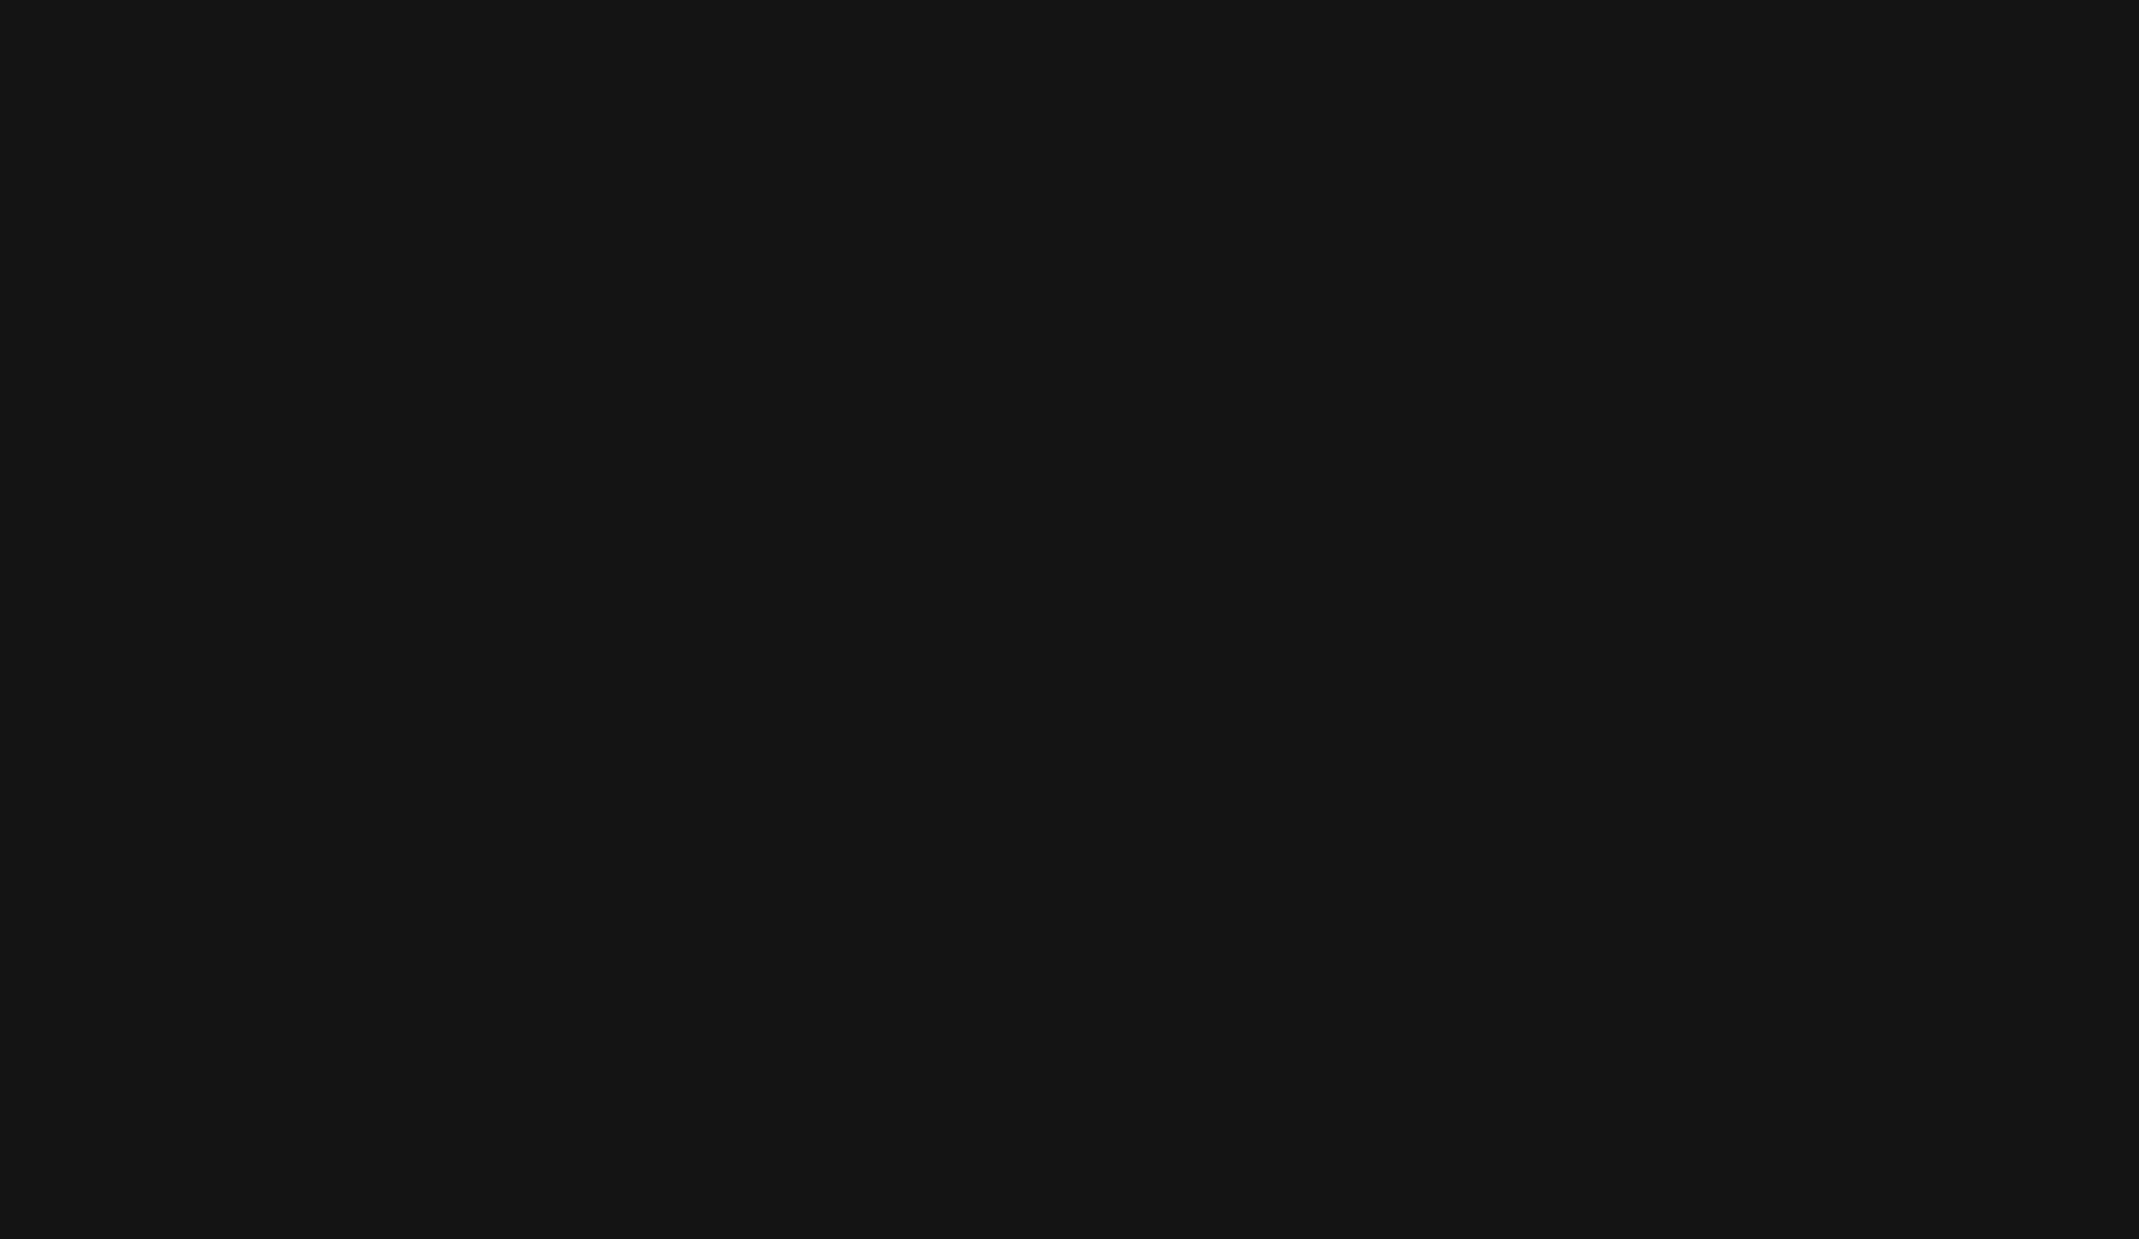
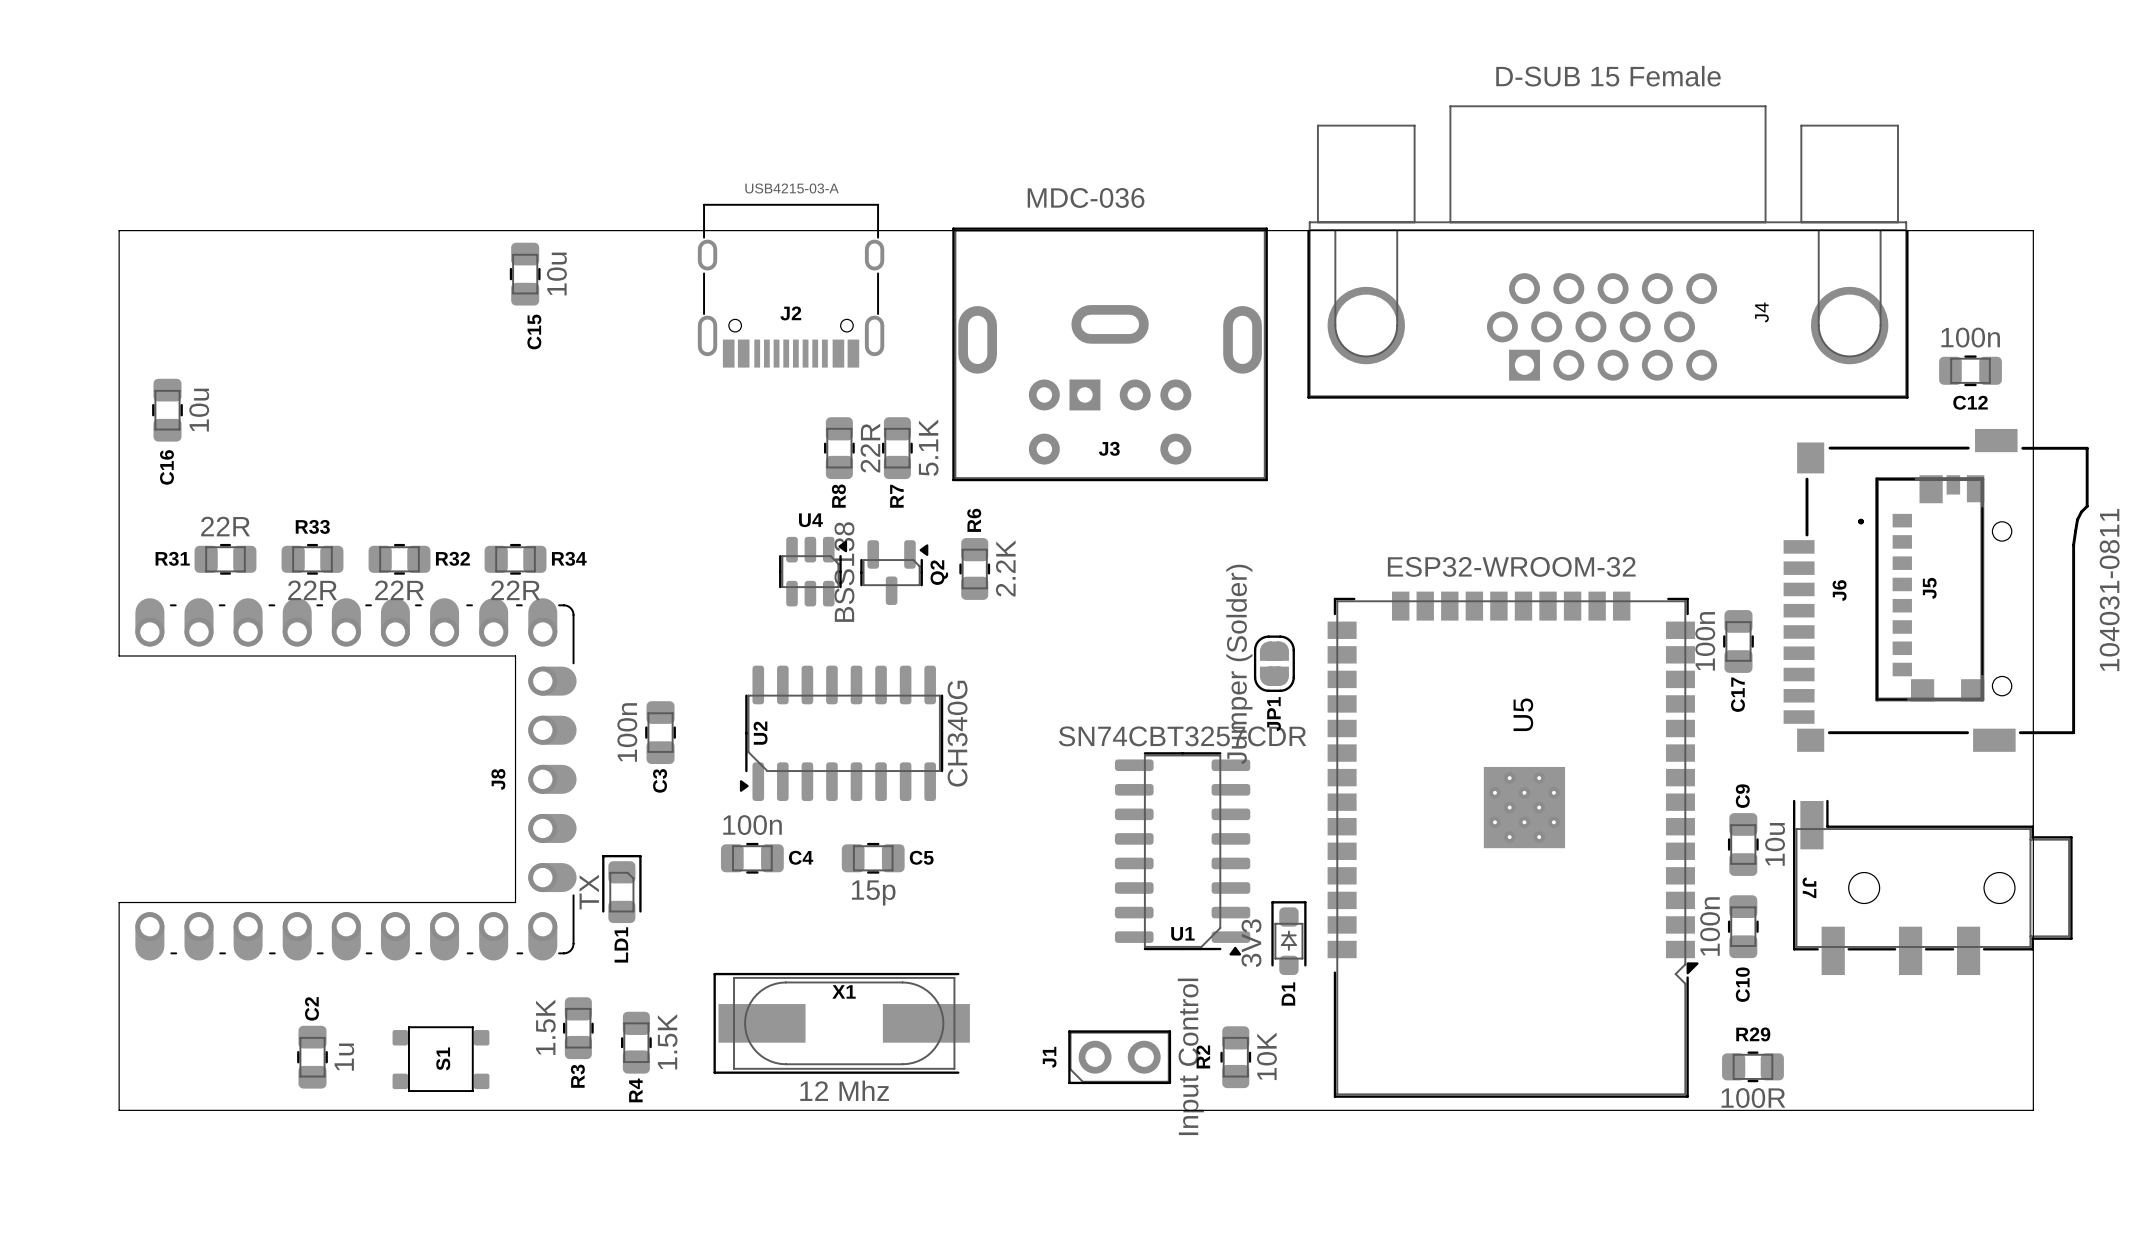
board edge: none -> (119, 230) (119, 655) (515, 655) (515, 902) (119, 902) (119, 1110) (2033, 1110) (2033, 230) (119, 230)
J4: none -> D-SUB 15 Female (1607, 251)
C15: none -> 10u (525, 274)
J2: none -> USB4215-03-A (791, 285)
J3: none -> MDC-036 (1110, 354)
C12: none -> 100n (1970, 370)
C16: none -> 10u (167, 410)
R8: none -> 22R (839, 448)
R7: none -> 5.1K (897, 448)
R31: none -> 22R (225, 559)
R33: none -> 22R (312, 559)
R32: none -> 22R (399, 559)
R34: none -> 22R (515, 559)
R6: none -> 2.2K (974, 568)
U4: none -> (813, 571)
Q2: none -> BSS138 (894, 572)
J5: none -> (1921, 588)
J6: none -> 104031-0811 (1936, 590)
C17: none -> 100n (1738, 641)
JP1: none -> Jumper (Solder) (1274, 663)
C3: none -> 100n (660, 732)
U2: none -> CH340G (841, 733)
J8: none -> (356, 779)
U5: none -> ESP32-WROOM-32 (1513, 844)
C9: none -> 10u (1743, 844)
U1: none -> SN74CBT3257CDR (1182, 853)
C4: none -> 100n (752, 858)
C5: none -> 15p (873, 858)
J7: none -> (1932, 887)
LD1: none -> TX (621, 889)
C10: none -> 100n (1743, 926)
D1: none -> 3V3 (1288, 938)
X1: none -> 12 Mhz (841, 1023)
R3: none -> 1.5K (578, 1028)
R4: none -> 1.5K (636, 1042)
C2: none -> 1u (312, 1057)
J1: none -> Input Control (1119, 1057)
R2: none -> 10K (1235, 1057)
S1: none -> (440, 1059)
R29: none -> 100R (1752, 1066)

